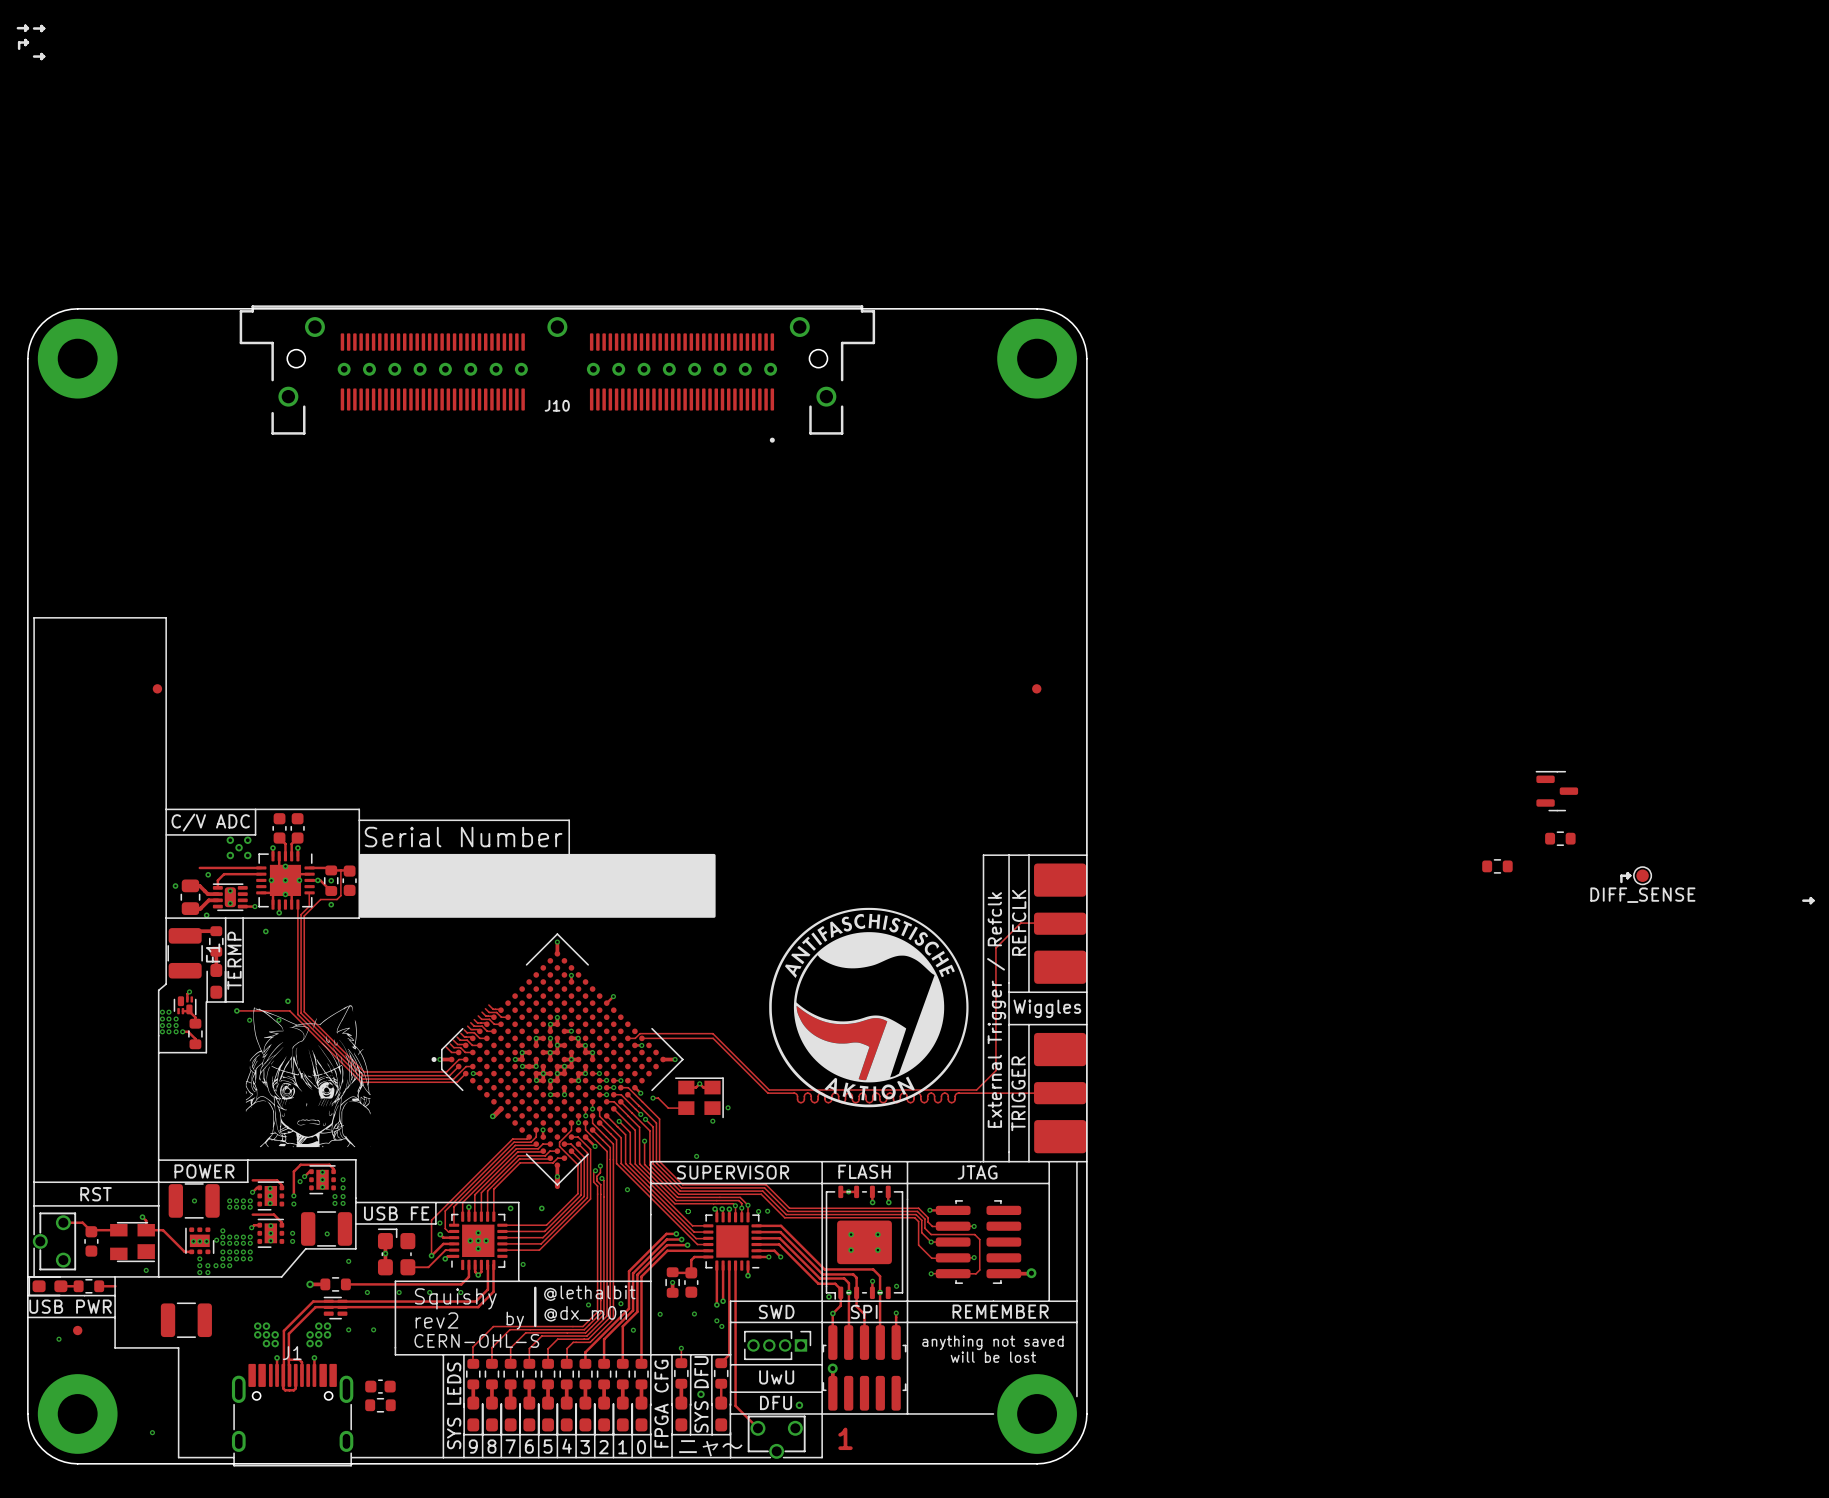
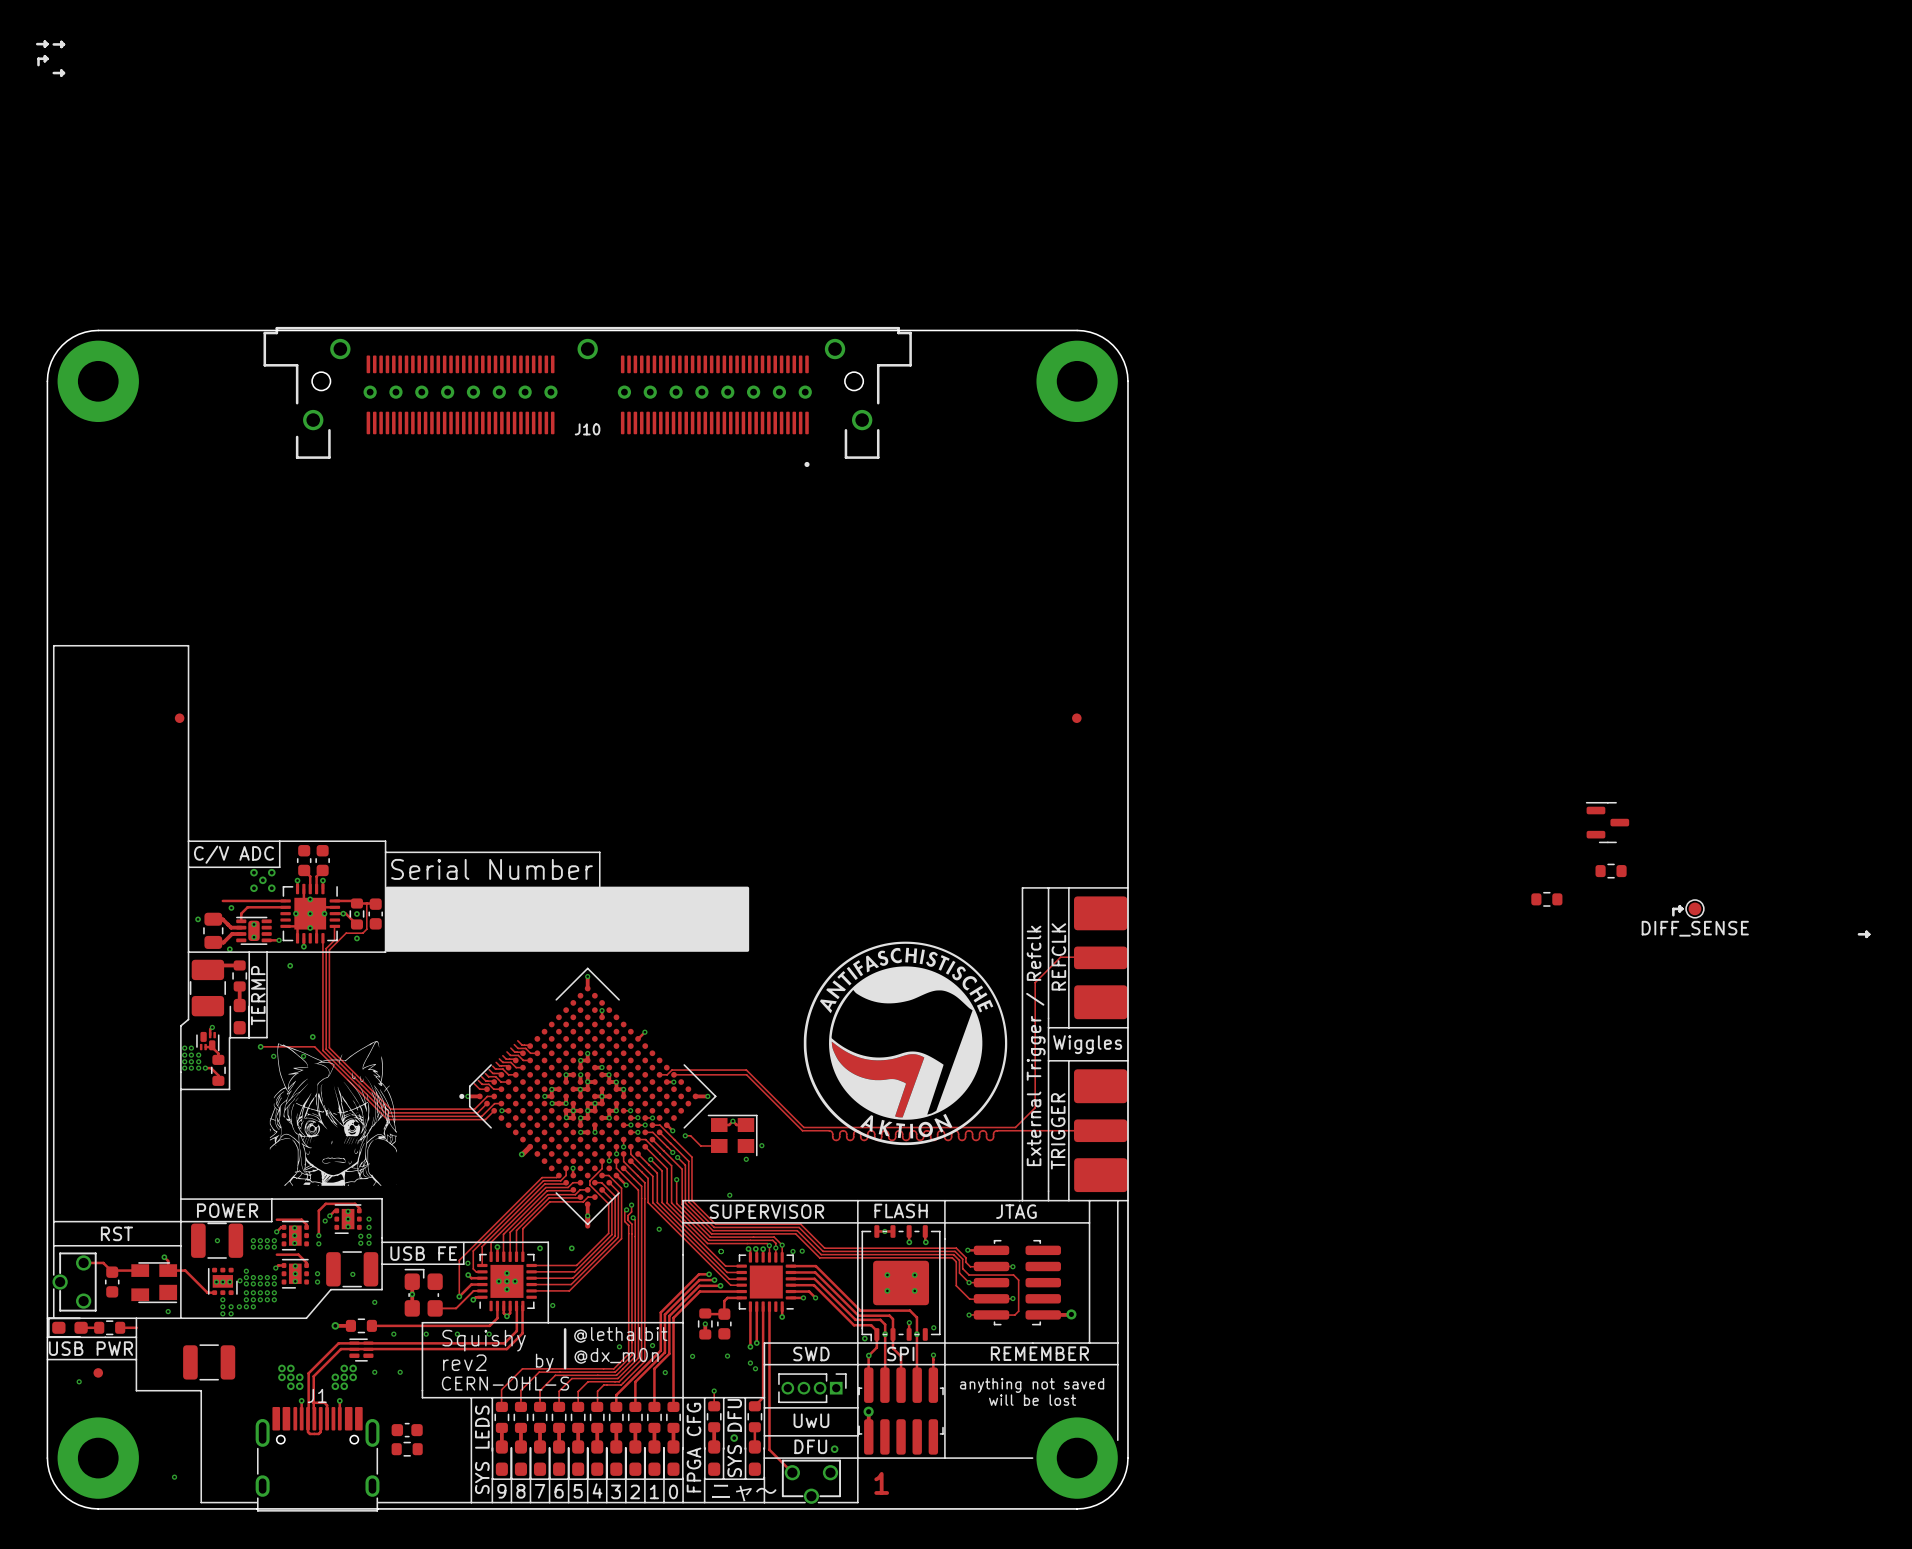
F1: (185, 953) -> none
part: none -> (207, 988)

